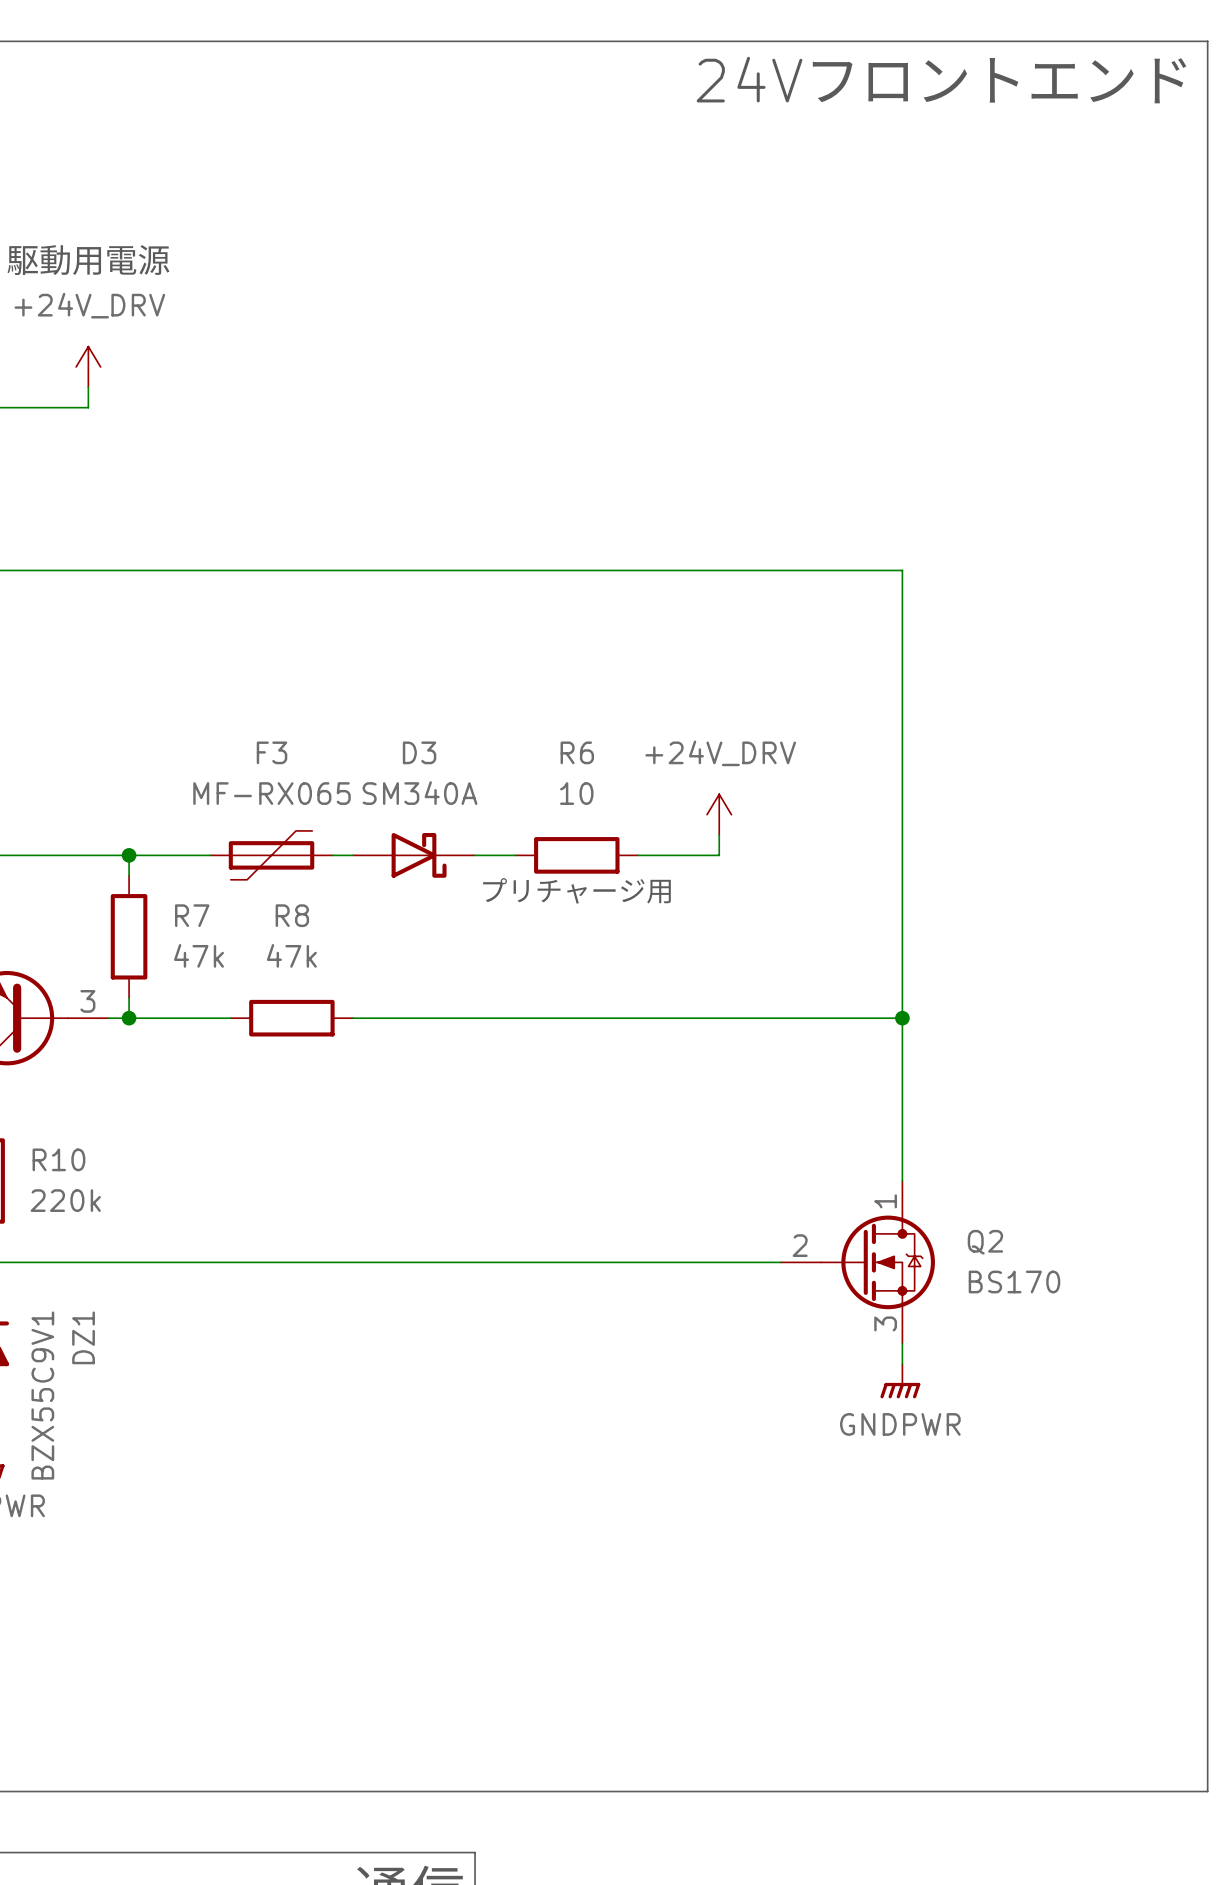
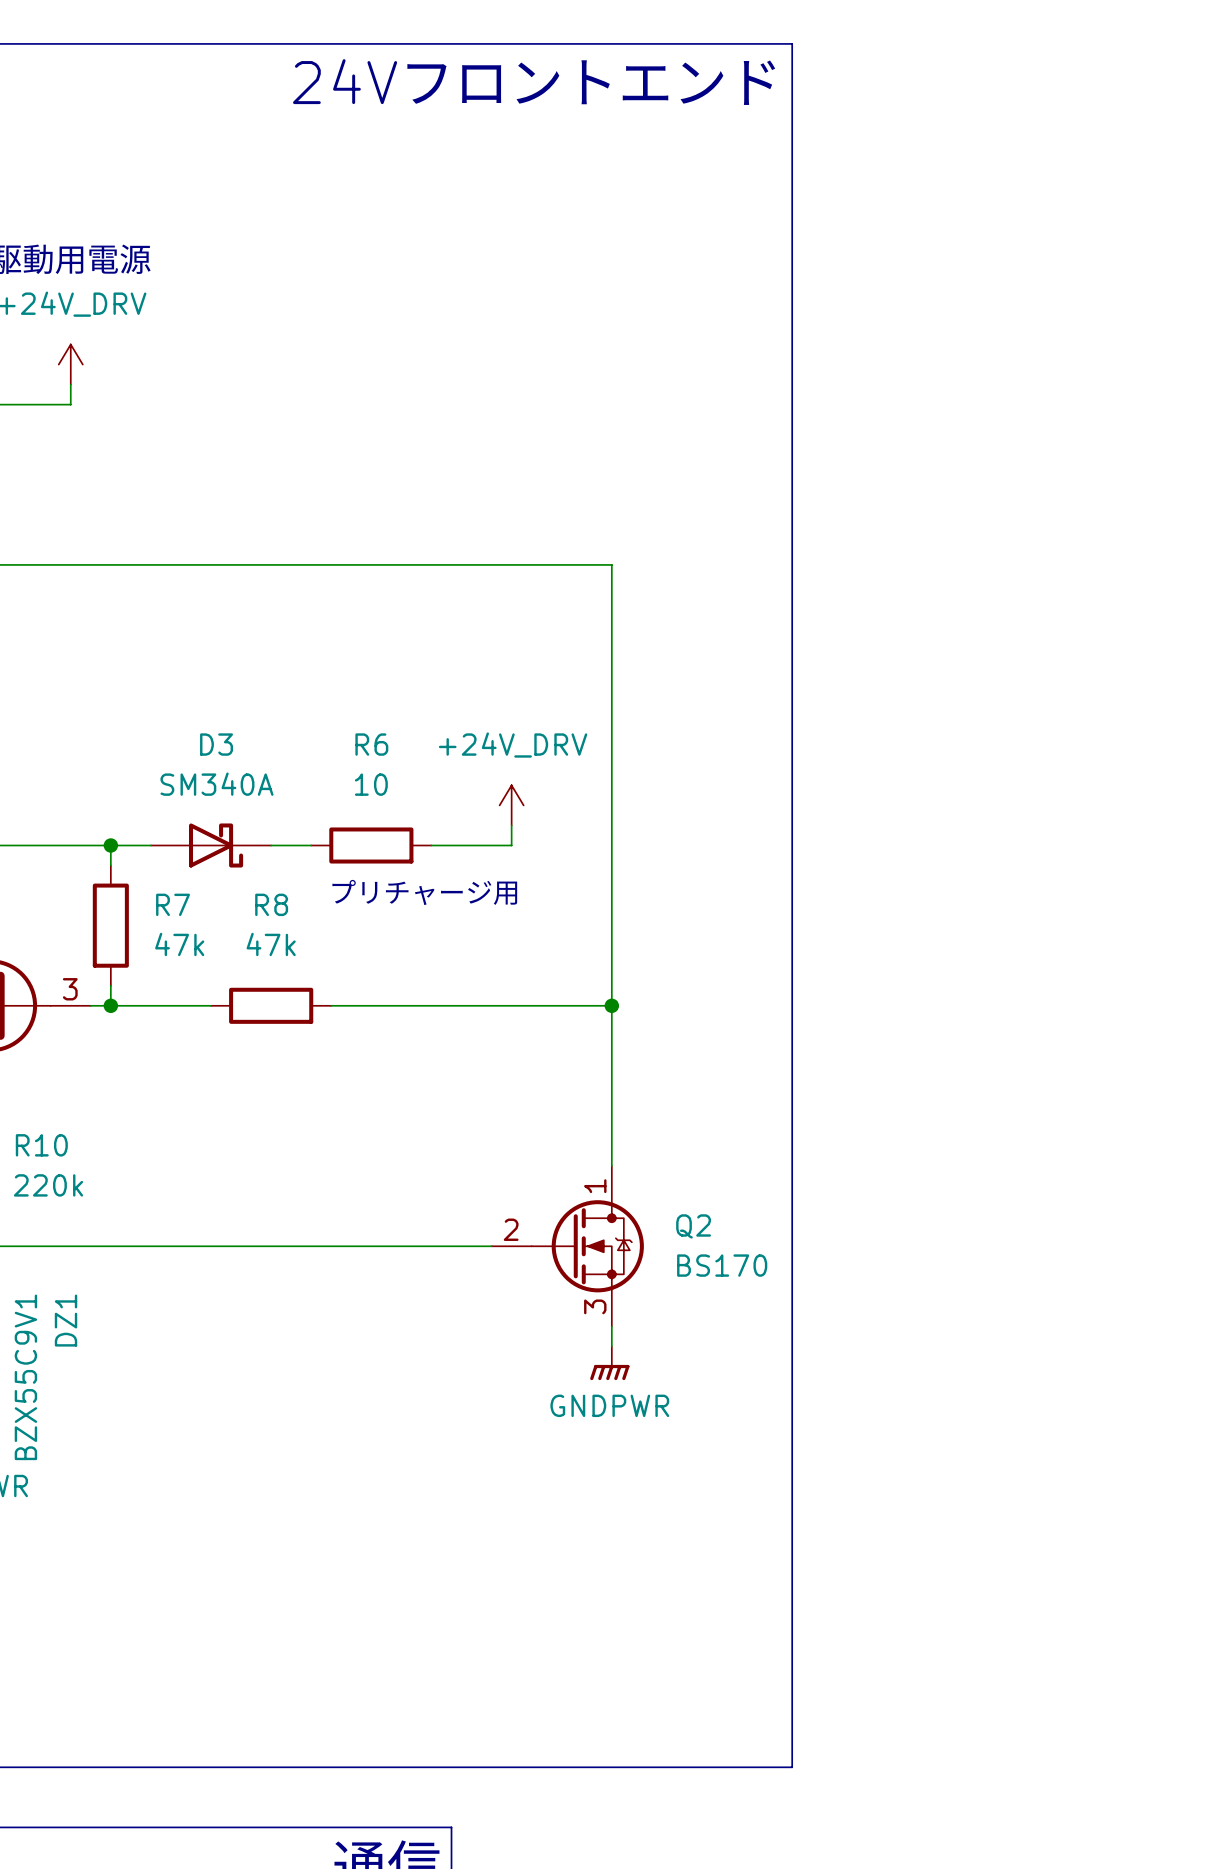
line: (821, 41) (1207, 41) (1207, 1791) (821, 1791) -> (792, 43) (792, 1767)
text position: 24Vフロントエンド (942, 80) -> 24Vフロントエンド (534, 82)
wire: (637, 570) (902, 570) (902, 1180) -> (611, 564) (611, 1166)
power symbol position: +24V_DRV (719, 814) -> +24V_DRV (511, 805)
wire: (719, 835) (719, 855) (637, 855) -> none
F3: MF-RX065 (271, 855) -> none
D3 position: (413, 855) -> (211, 845)
R6 position: (576, 855) -> (371, 845)
text position: プリチャージ用 (577, 890) -> プリチャージ用 (424, 892)
wire: (637, 1018) (902, 1018) -> none
junction: none -> (611, 1005)
junction: (902, 1018) -> none
wire: (515, 1262) (780, 1262) -> none
Q2 position: (857, 1262) -> (567, 1246)
wire: (902, 1343) (902, 1364) -> (611, 1326) (611, 1346)
power symbol position: GNDPWR (900, 1381) -> GNDPWR (609, 1363)

